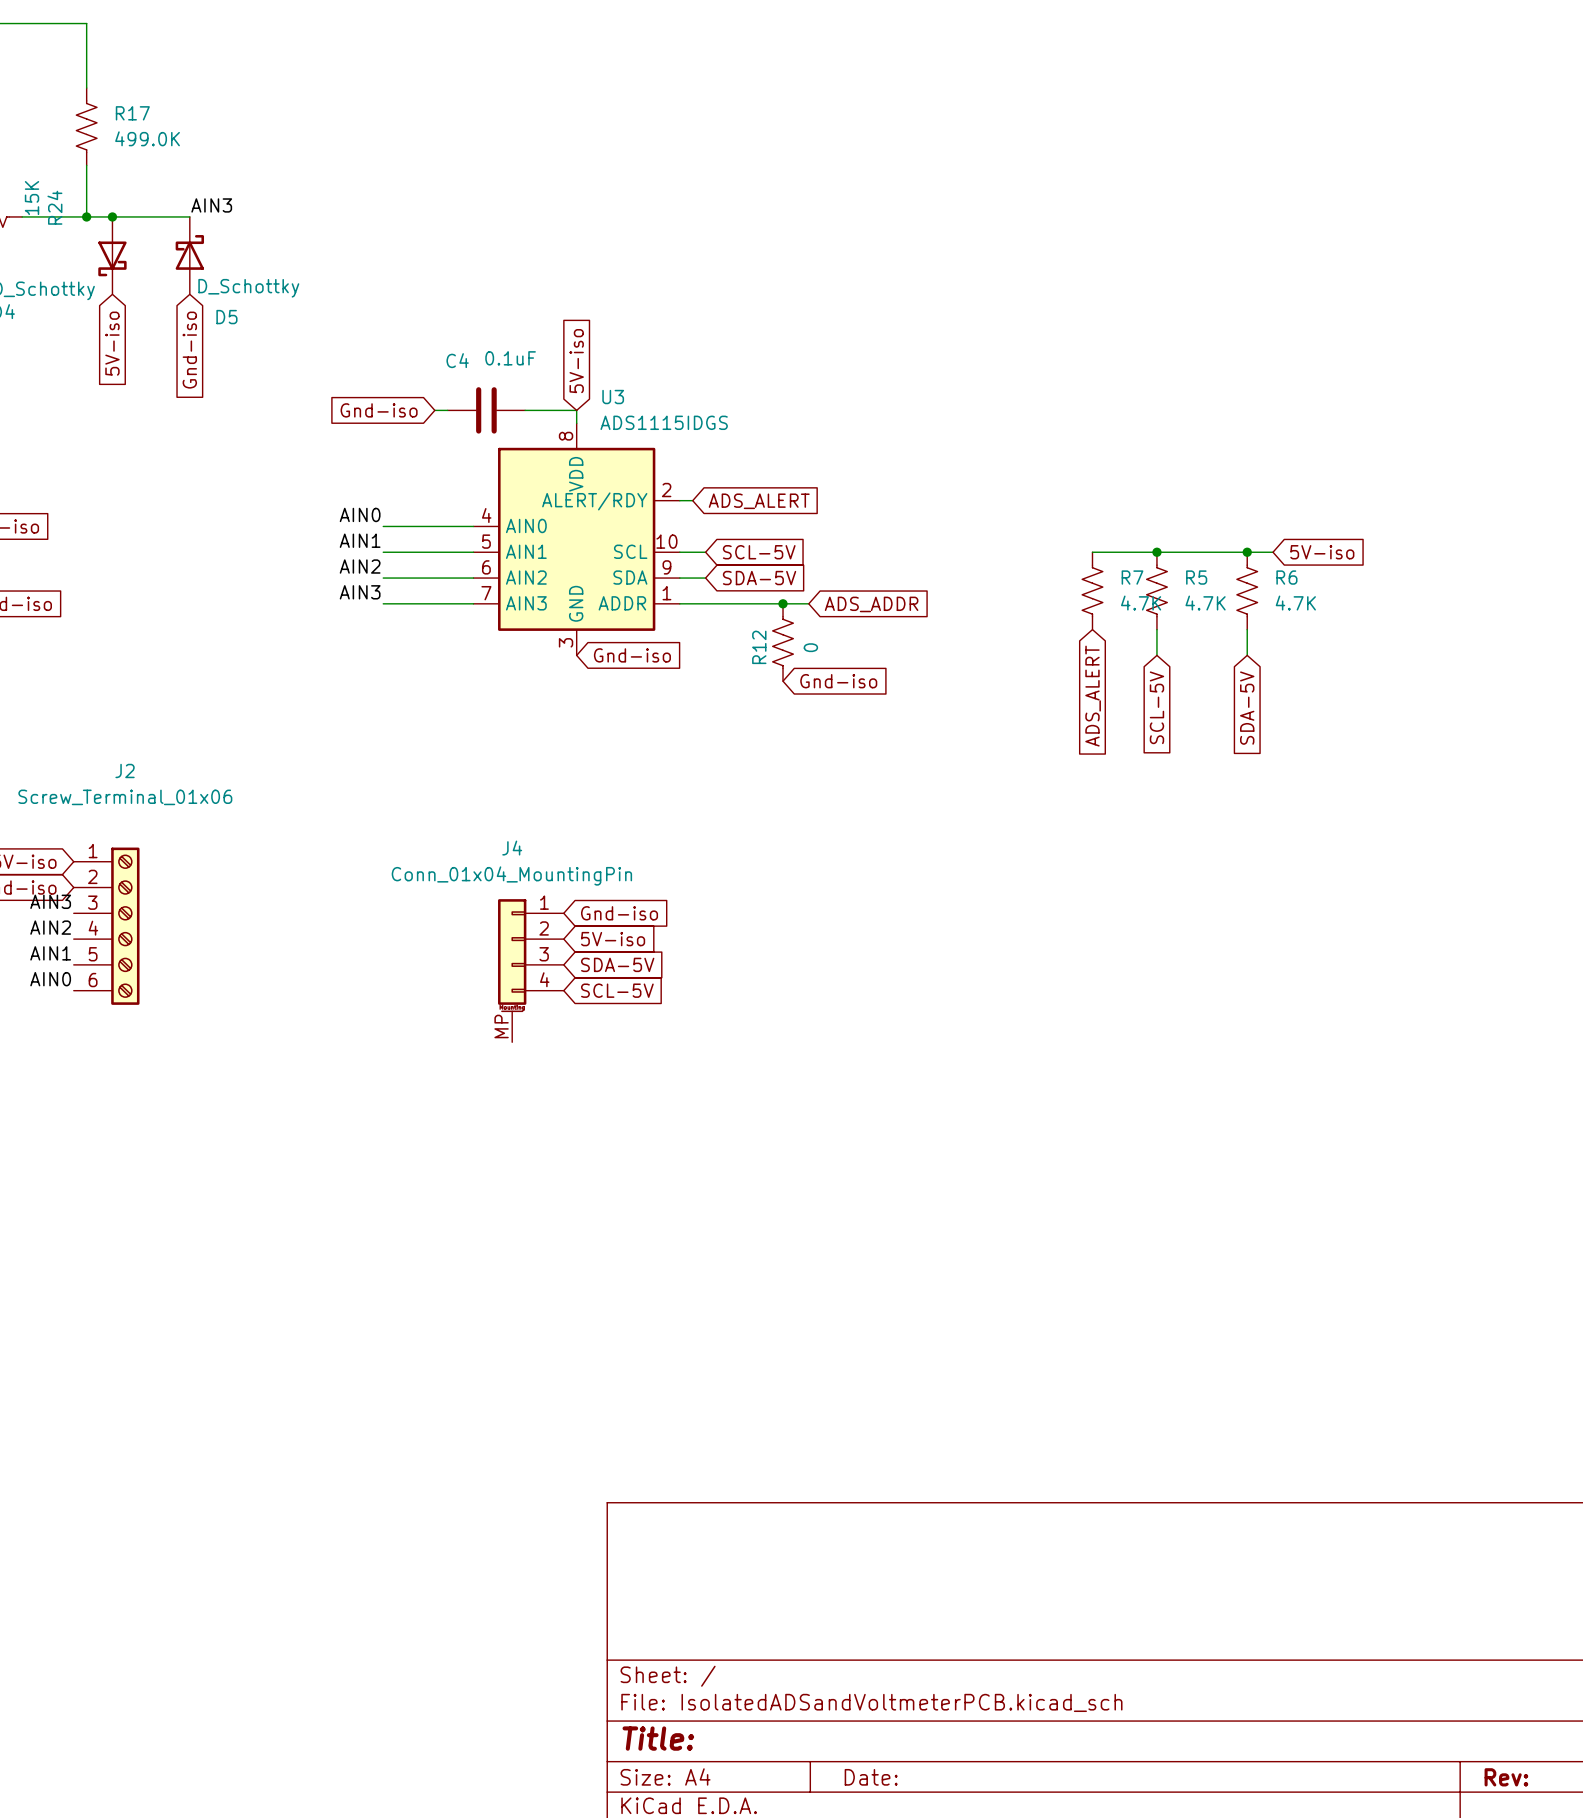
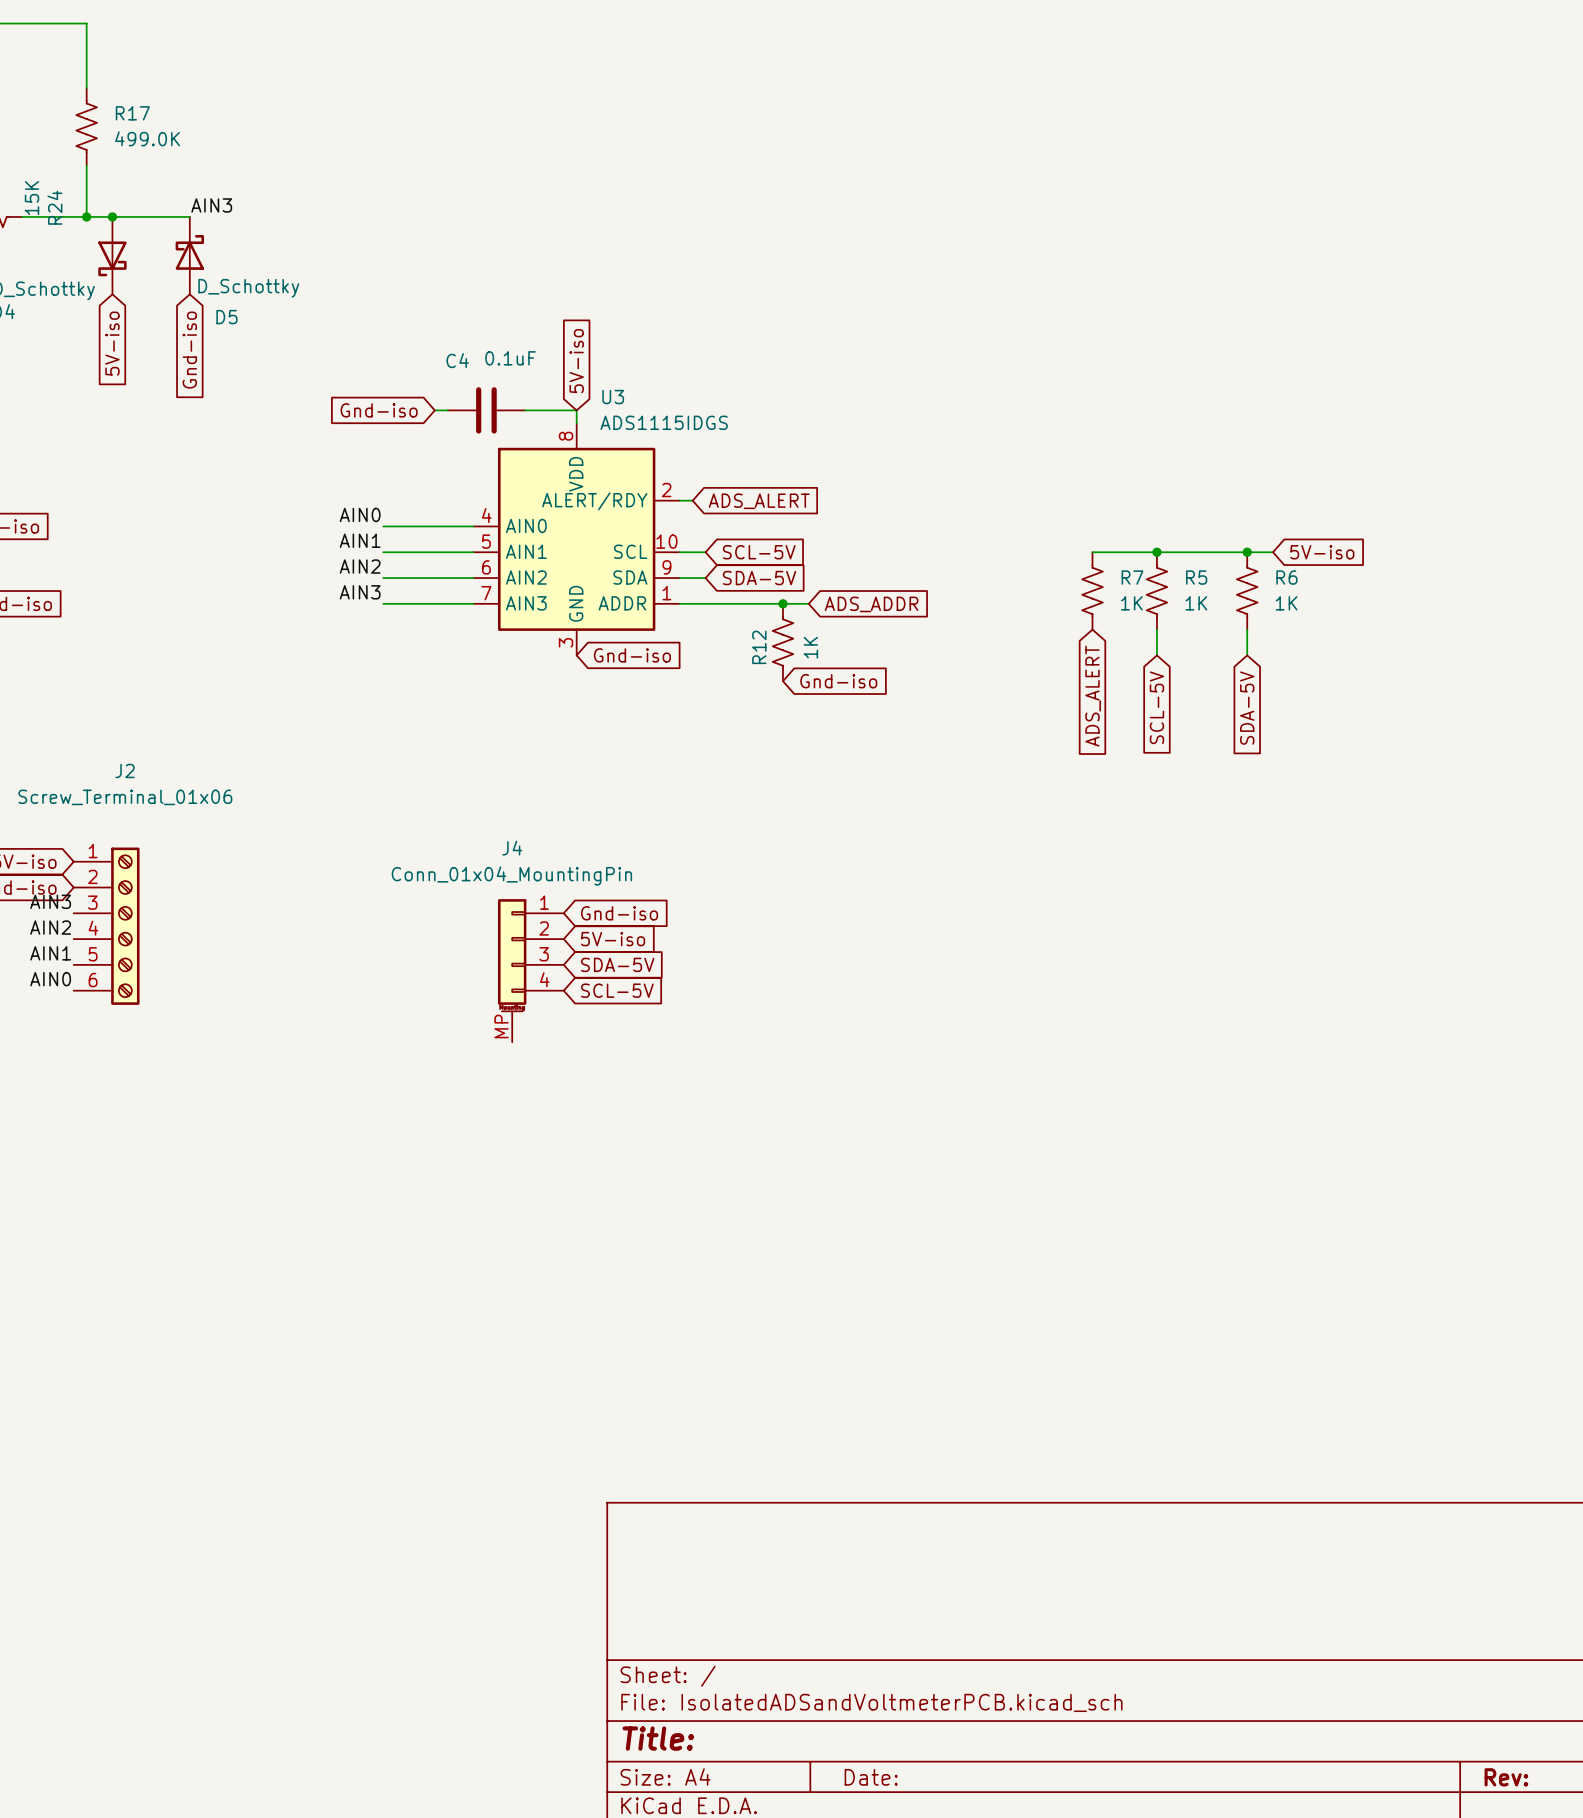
R7 value: 4.7K (1141, 603) -> 1K (1131, 603)
R5 value: 4.7K (1205, 603) -> 1K (1196, 603)
R6 value: 4.7K (1295, 603) -> 1K (1286, 603)
R12 value: 0 (810, 647) -> 1K (810, 647)

